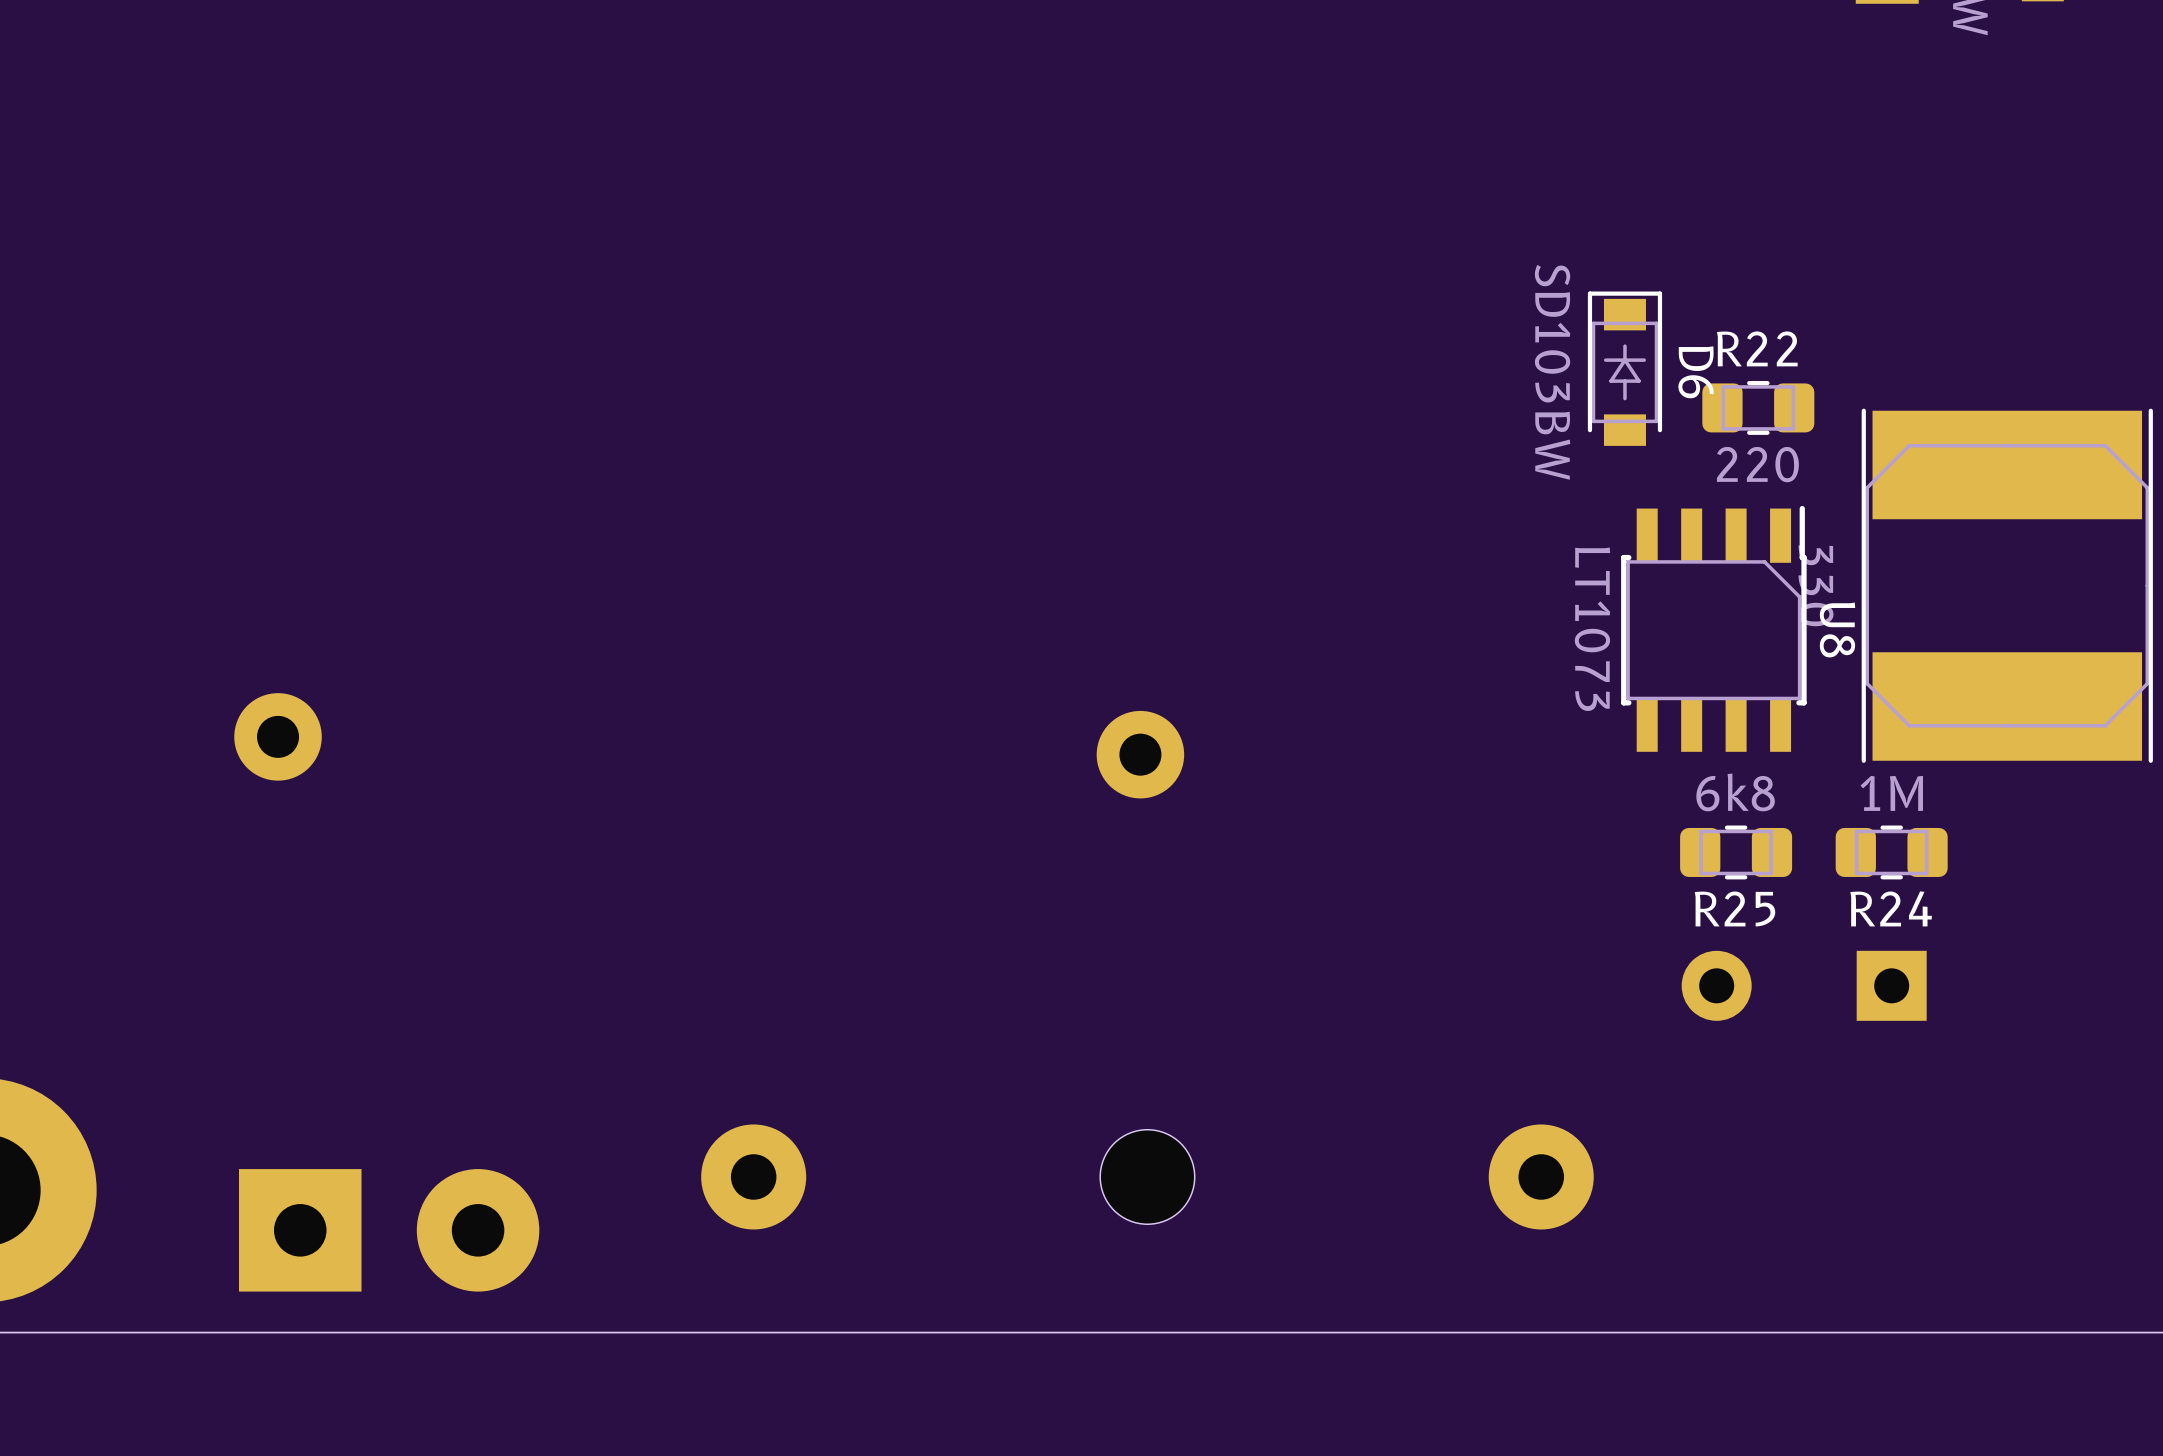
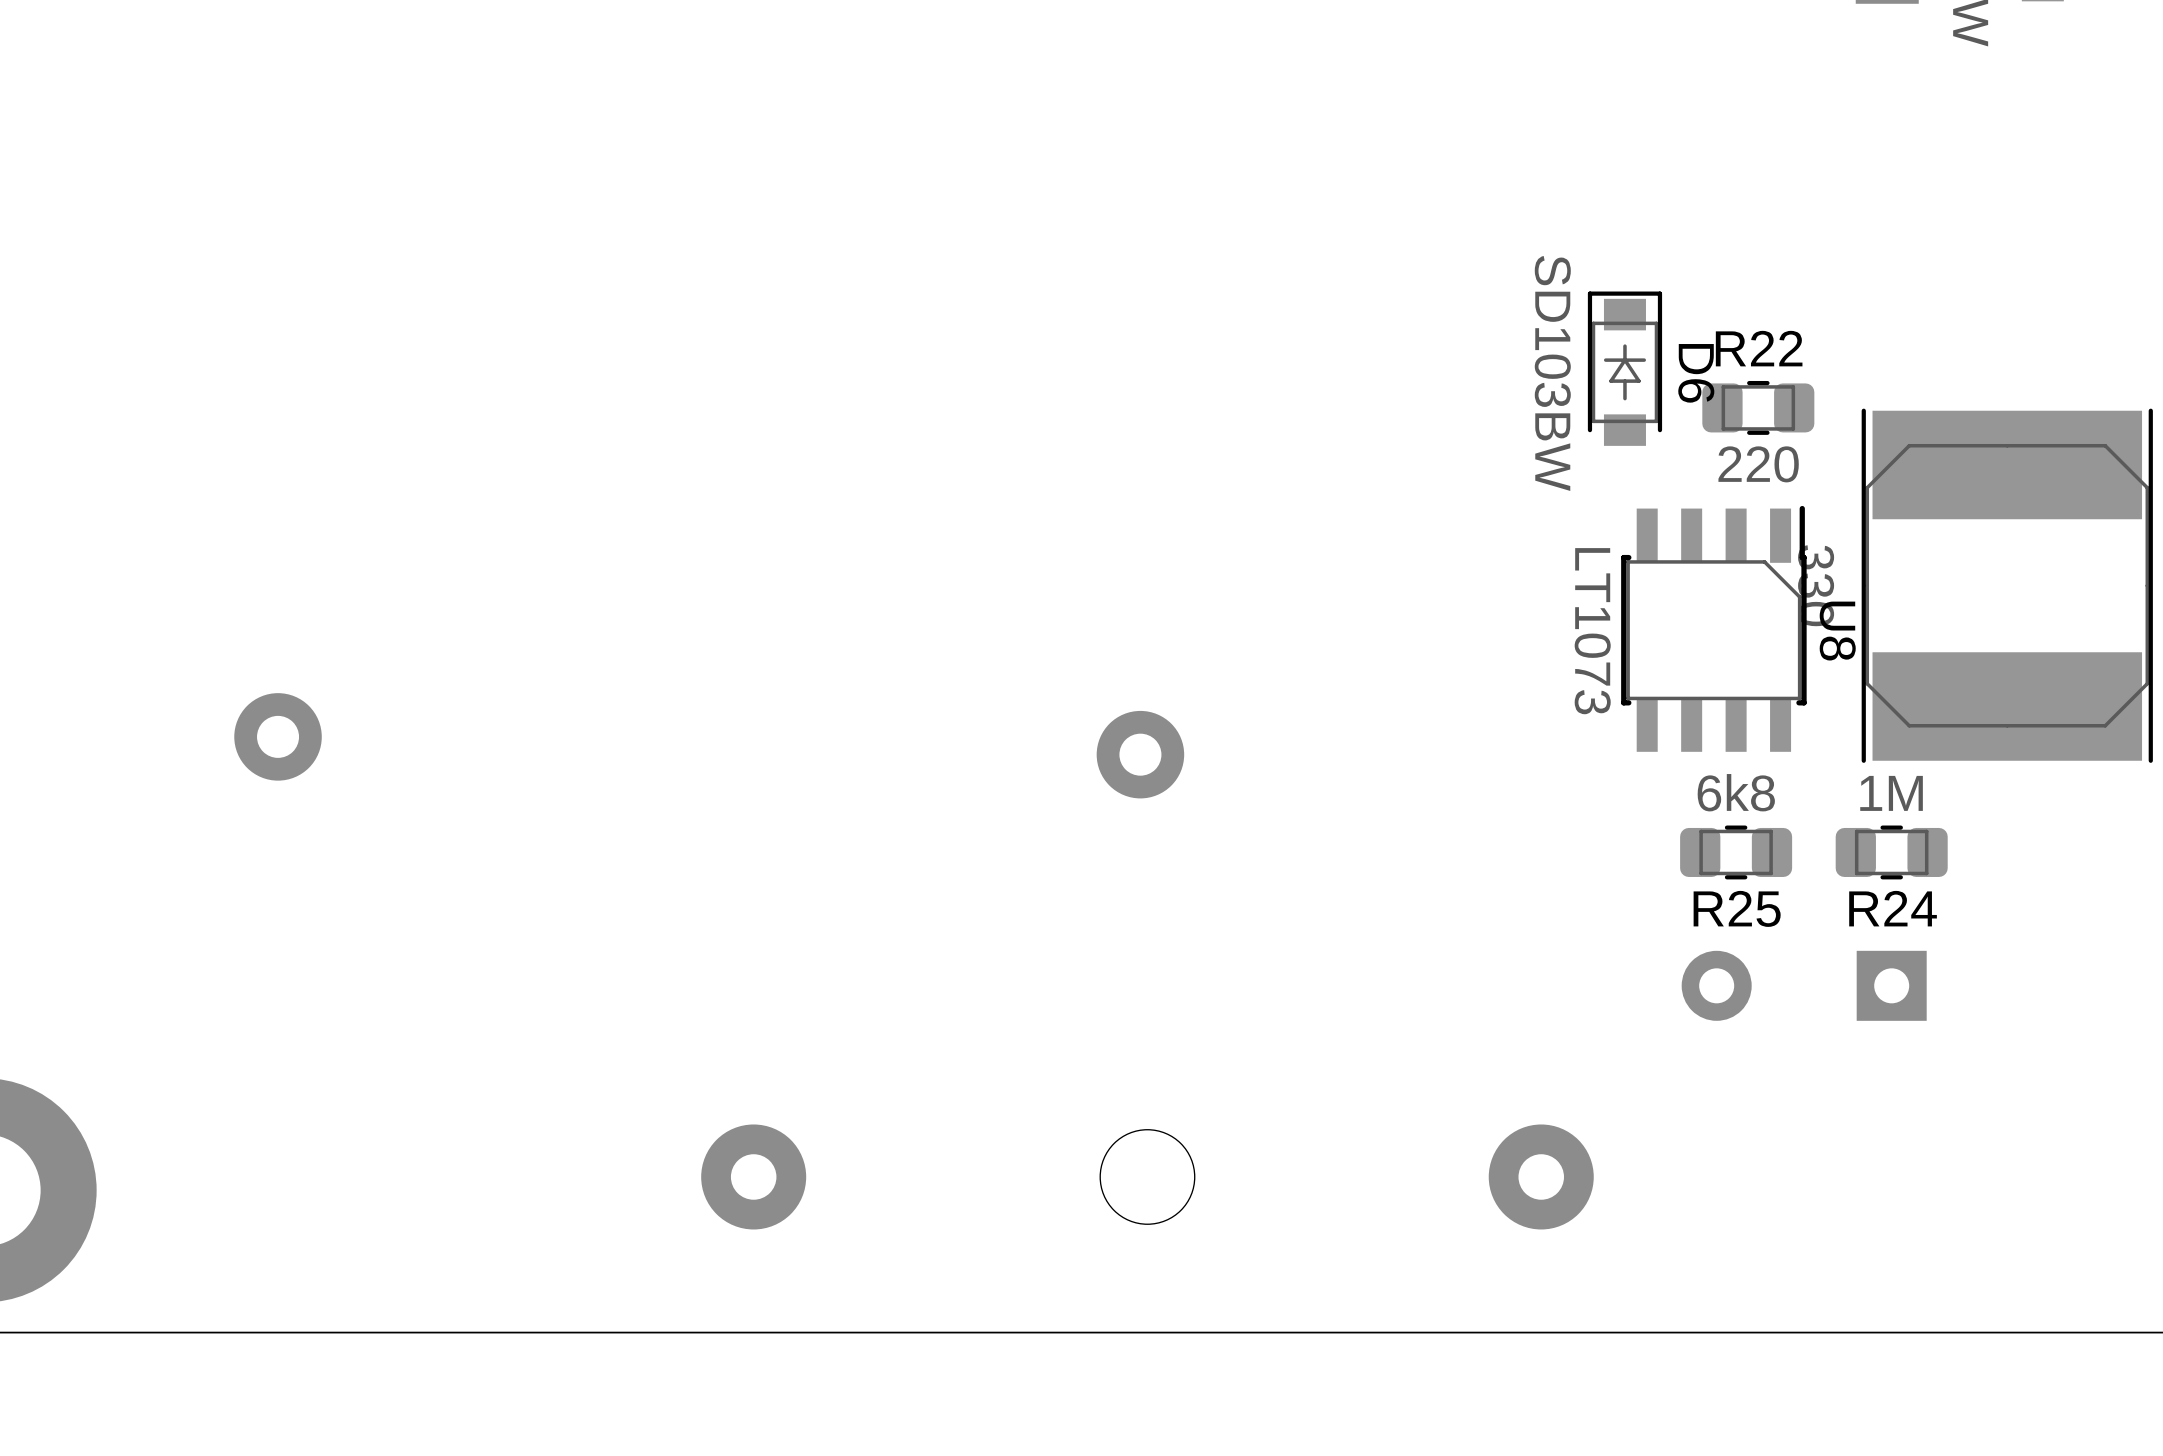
part: (389, 1230) -> none

